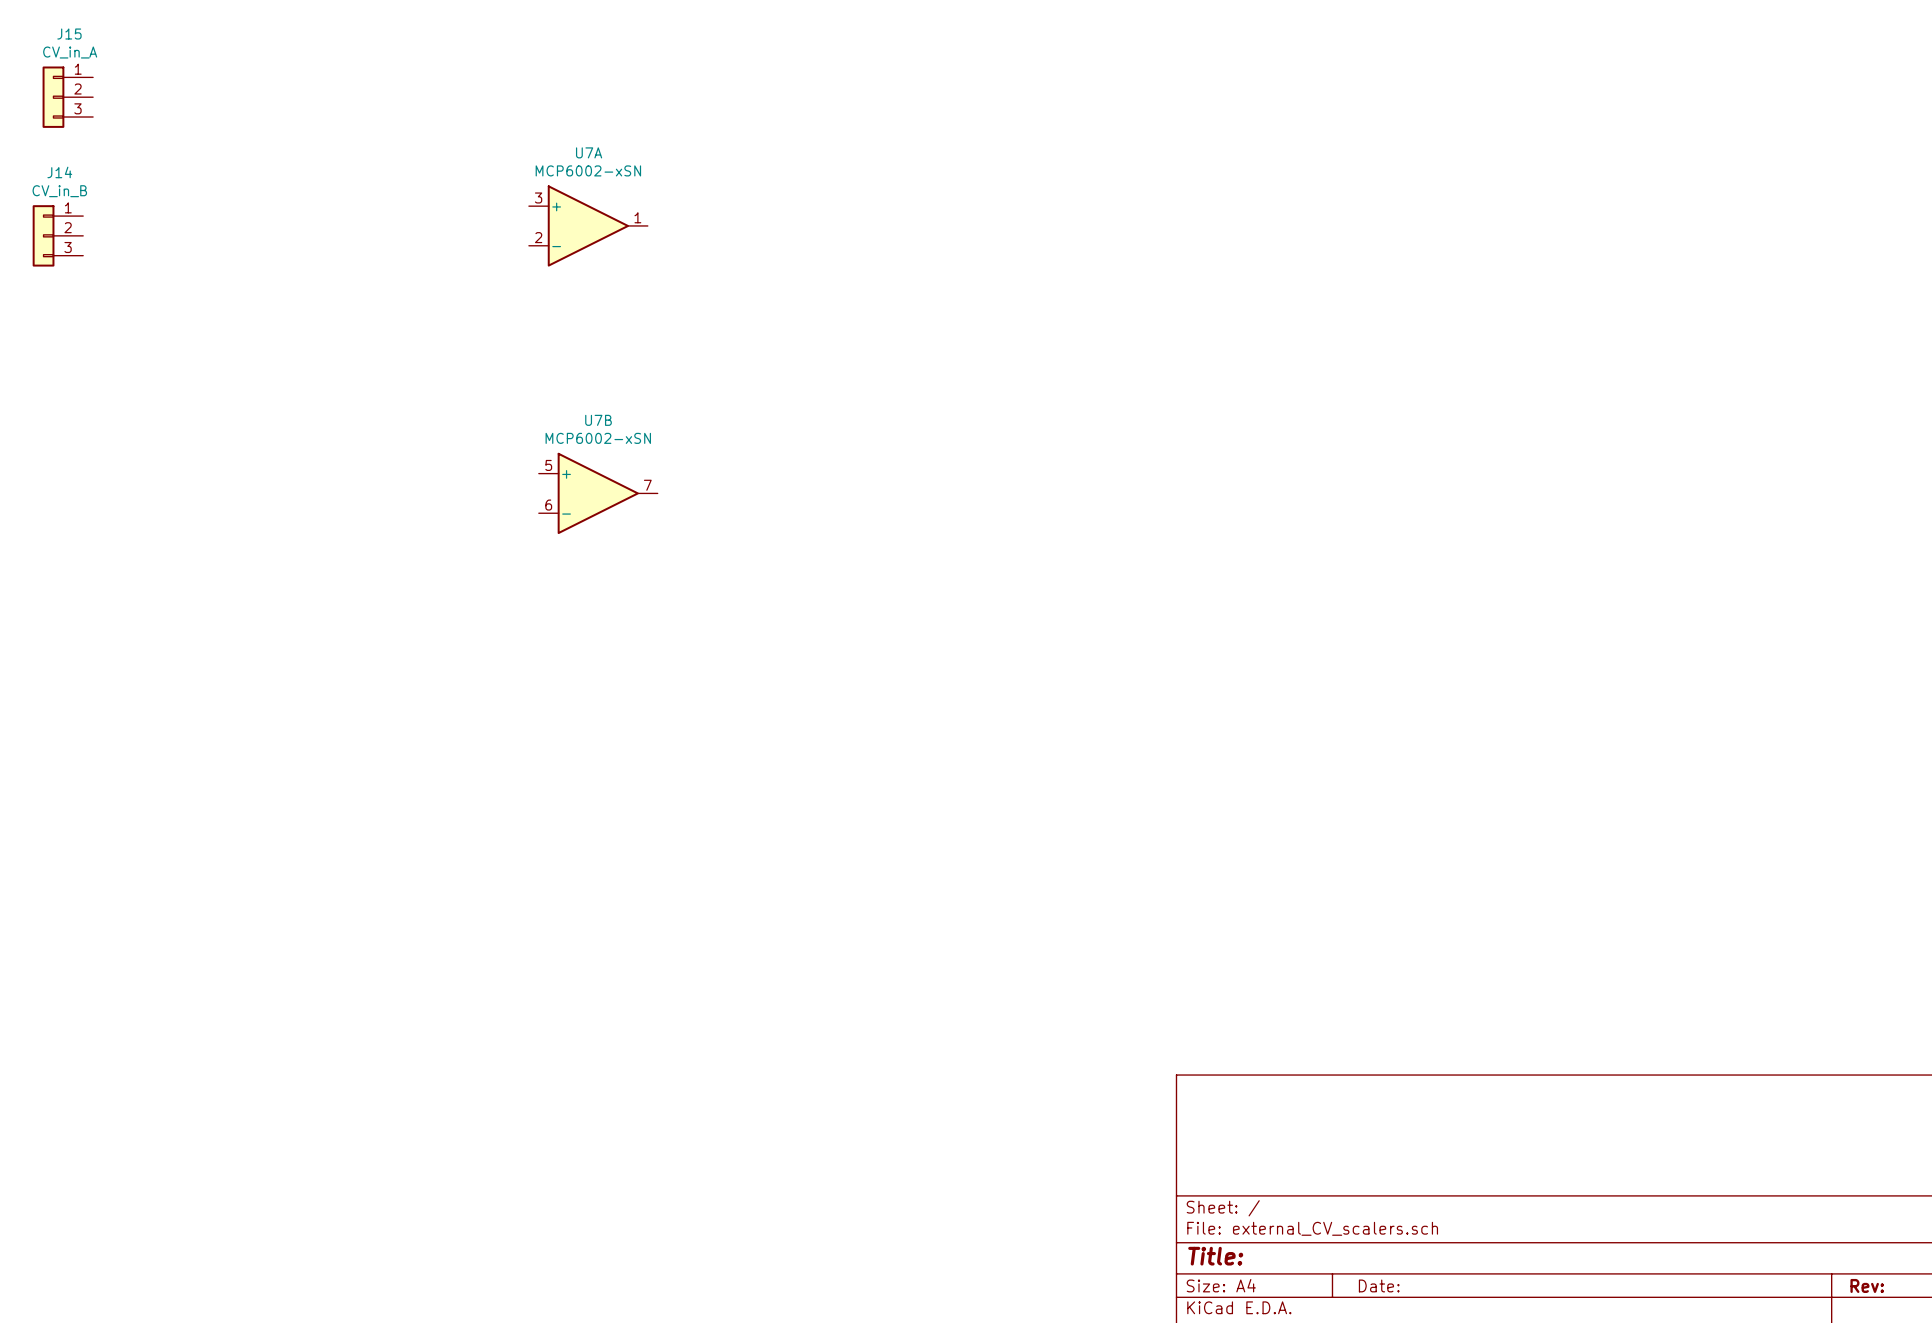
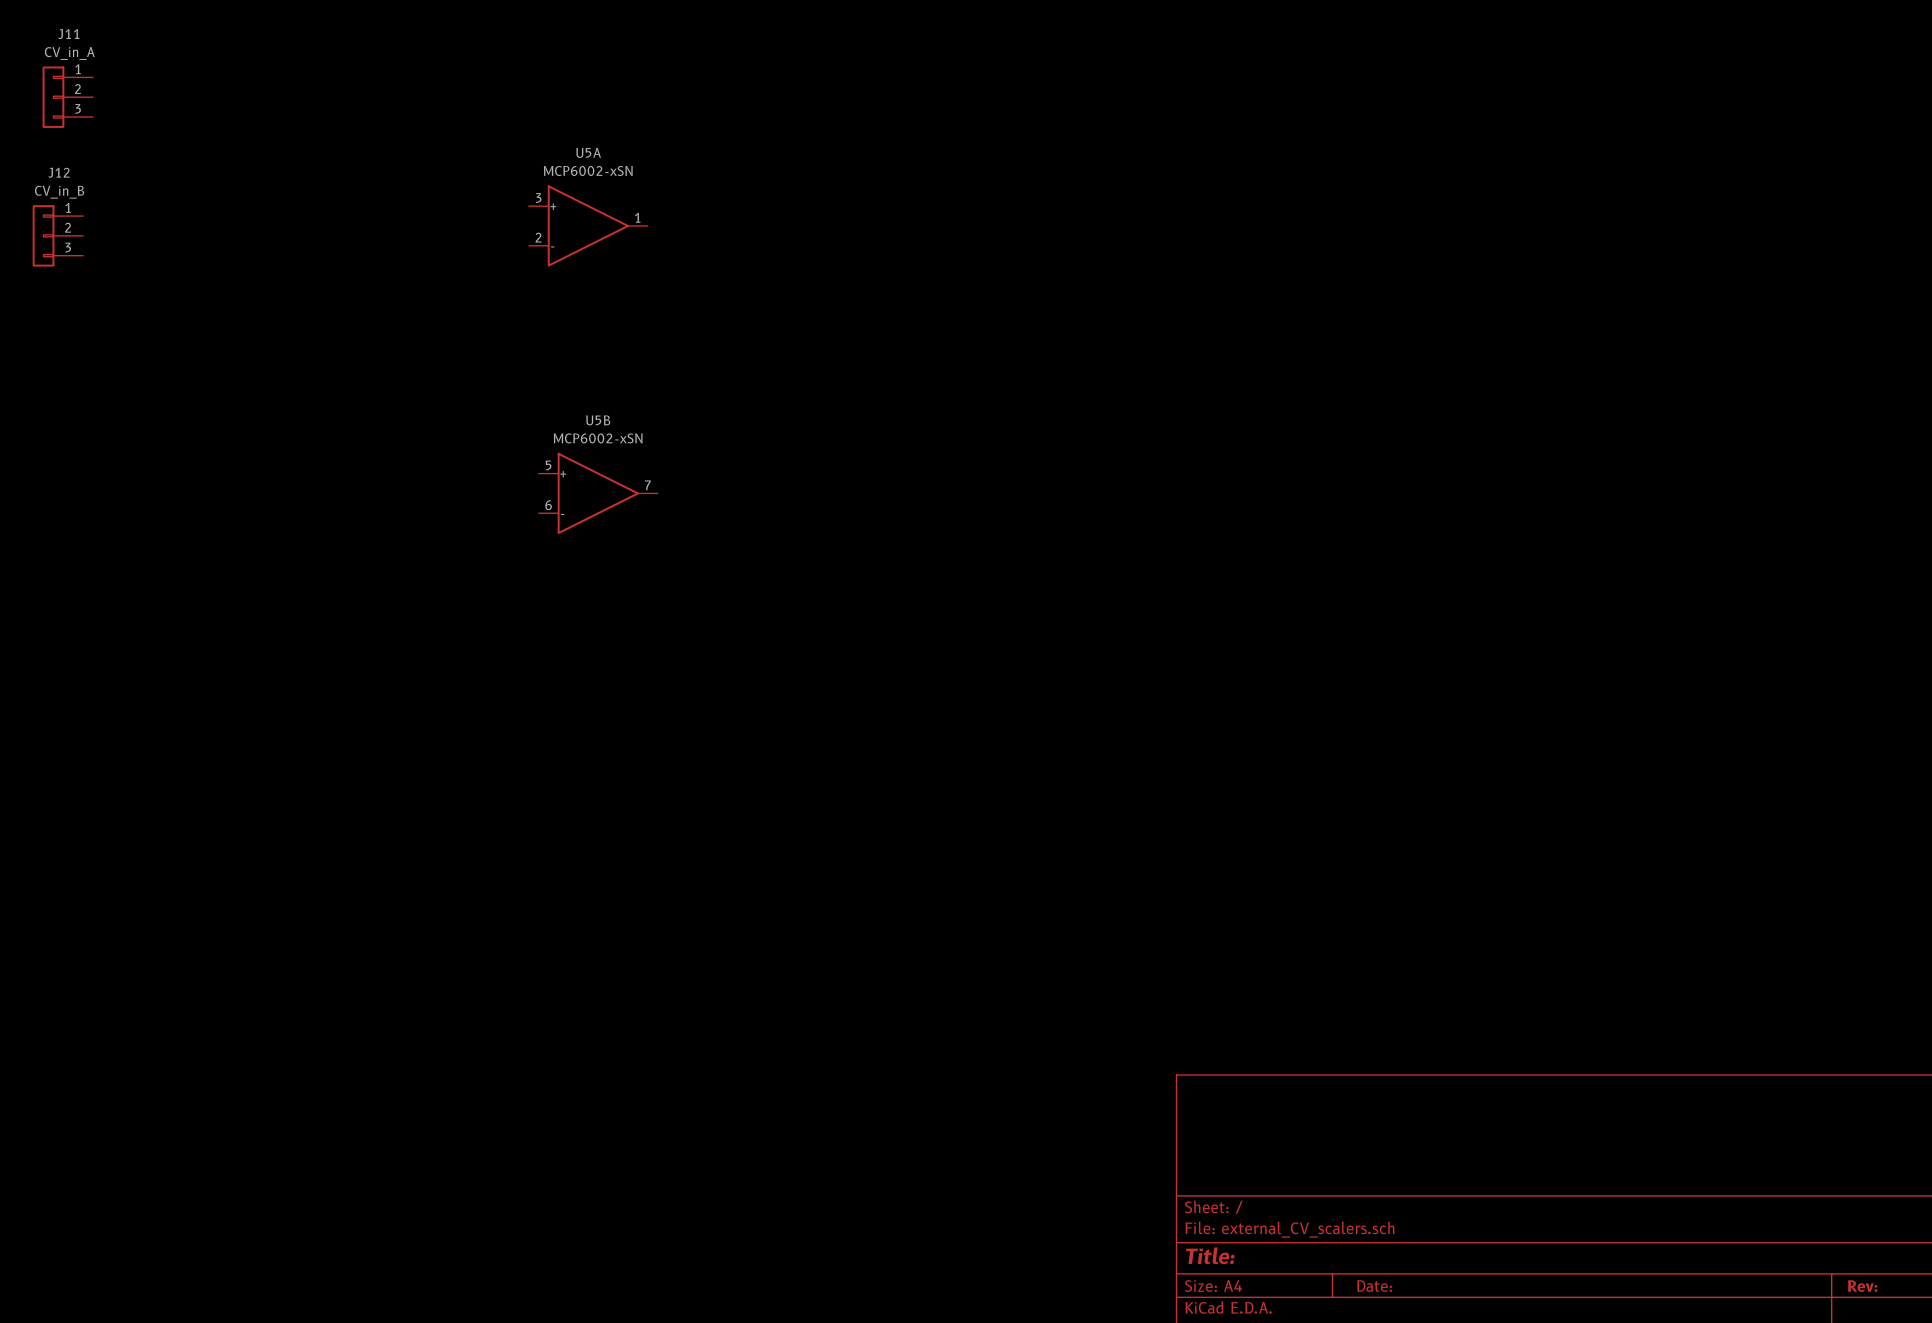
J15 name: J15 (69, 34) -> J11 (68, 34)
U7A name: U7A (589, 152) -> U5A (588, 152)
J14 name: J14 (59, 172) -> J12 (59, 172)
U7B name: U7B (598, 420) -> U5B (598, 420)

